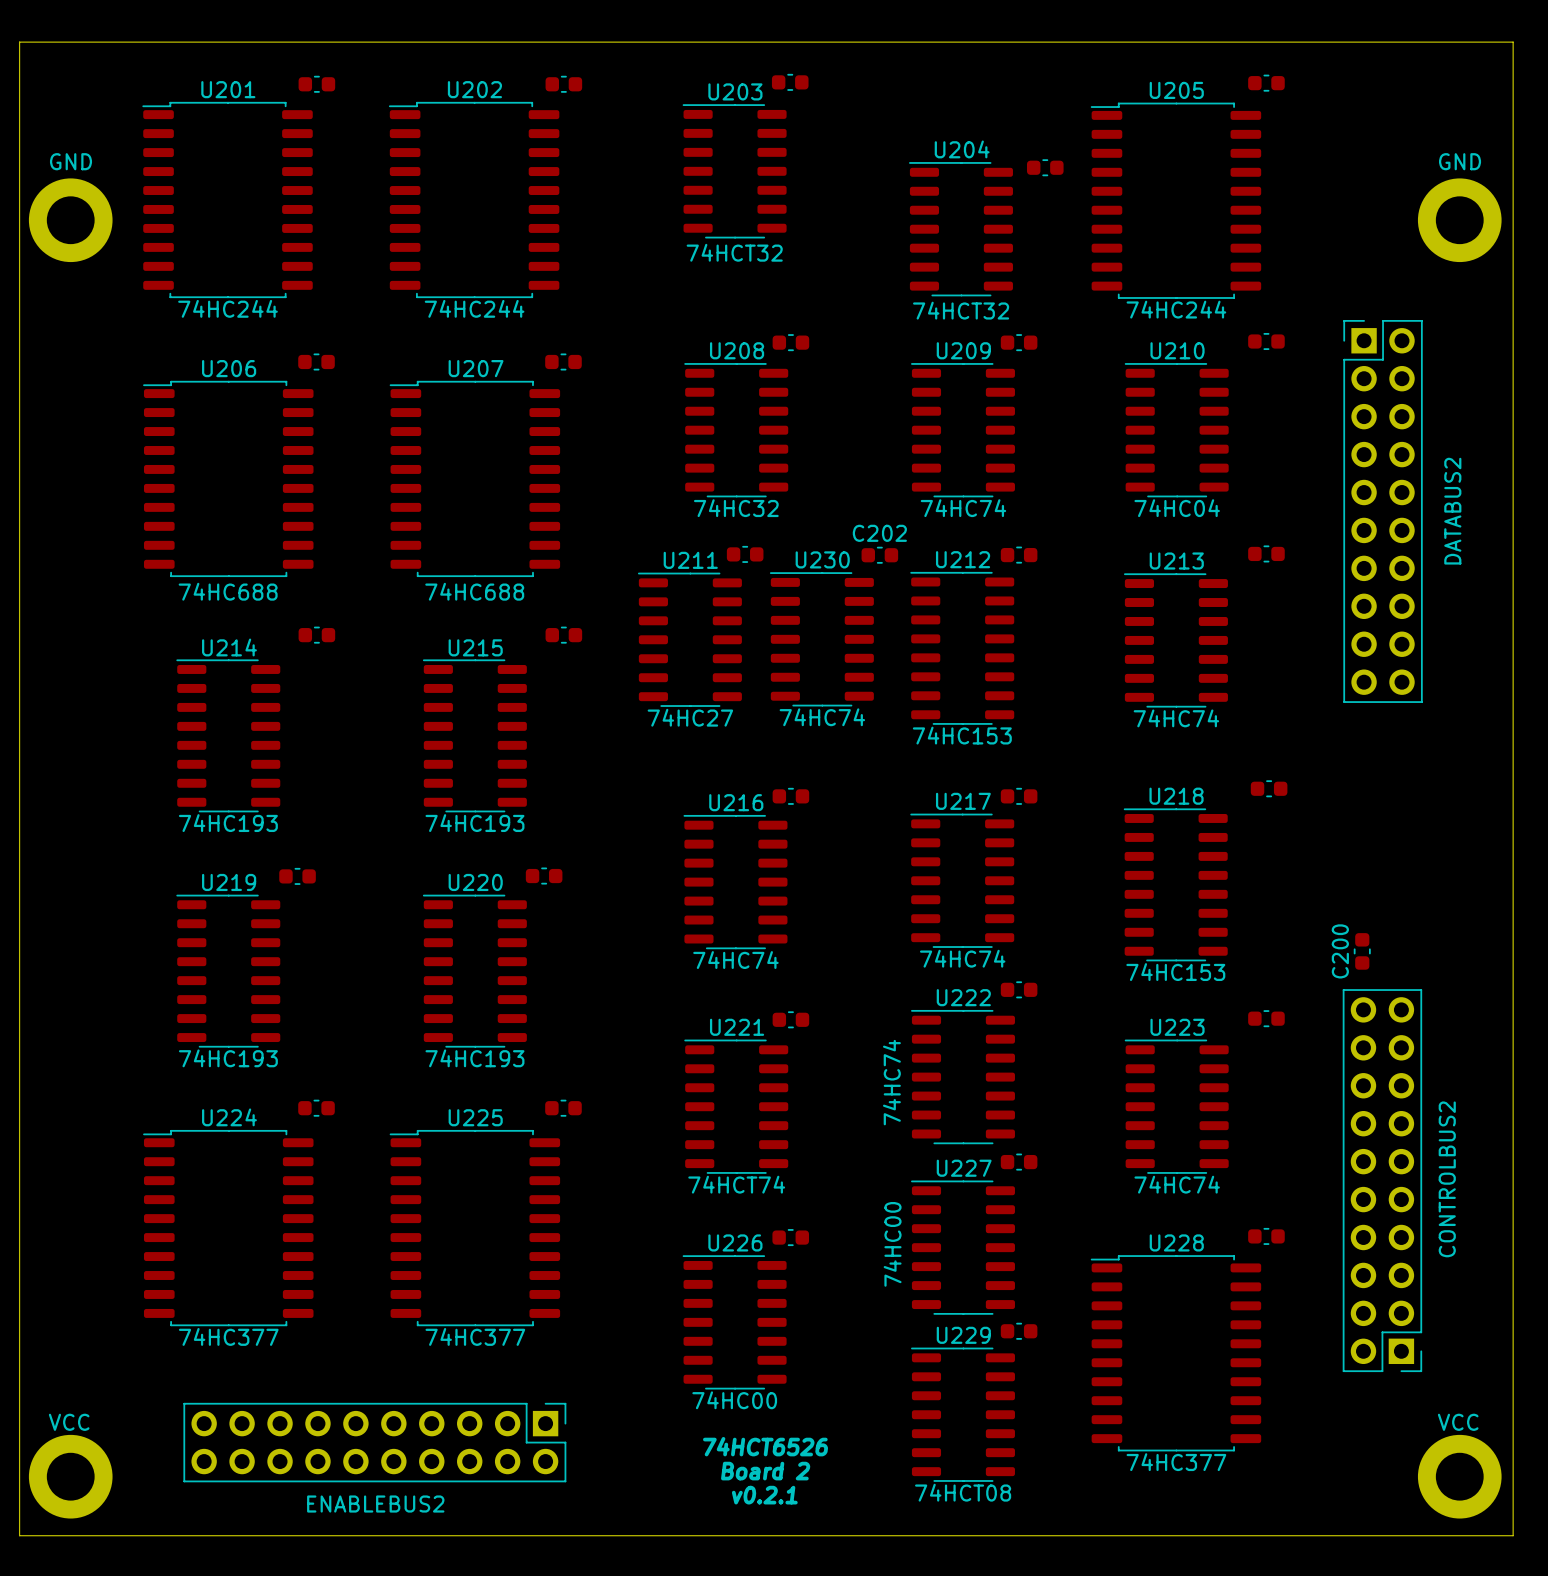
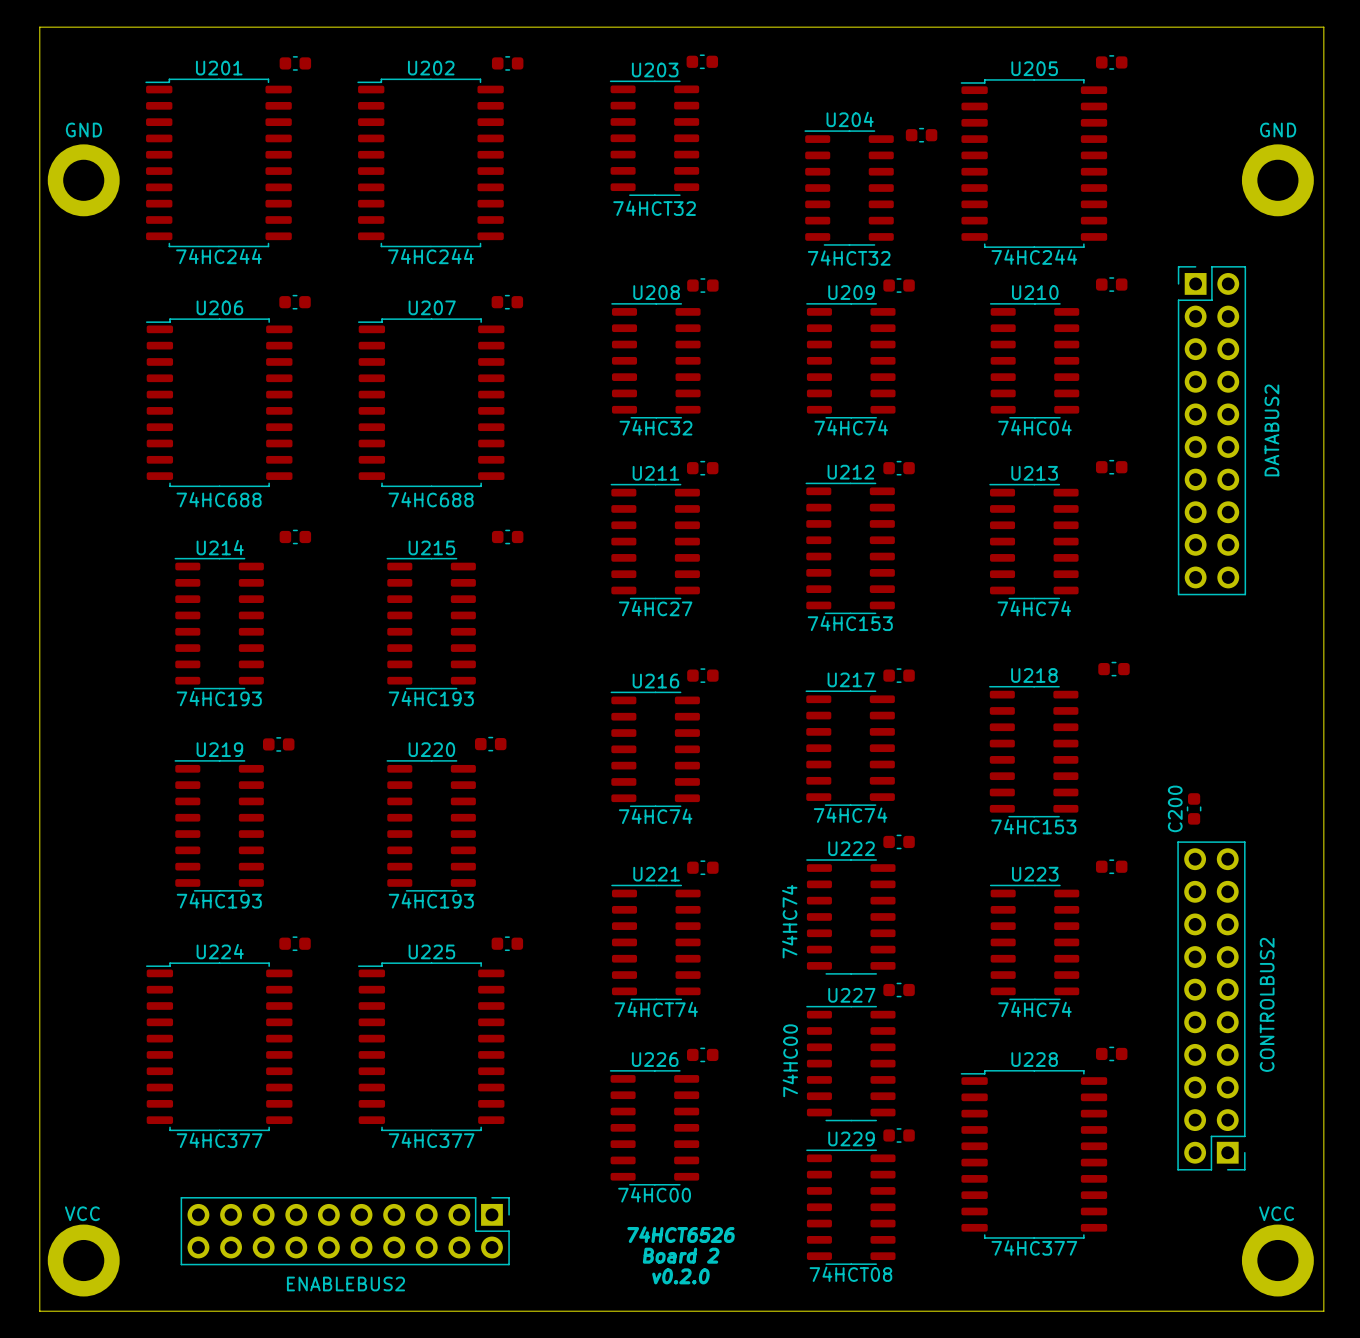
part position: (745, 554) -> (702, 468)
C202: (879, 555) -> none
U211 position: (689, 639) -> (655, 541)
U230: 74HC74 (821, 639) -> none
text: v0.2.1 (764, 1495) -> v0.2.0 (680, 1276)

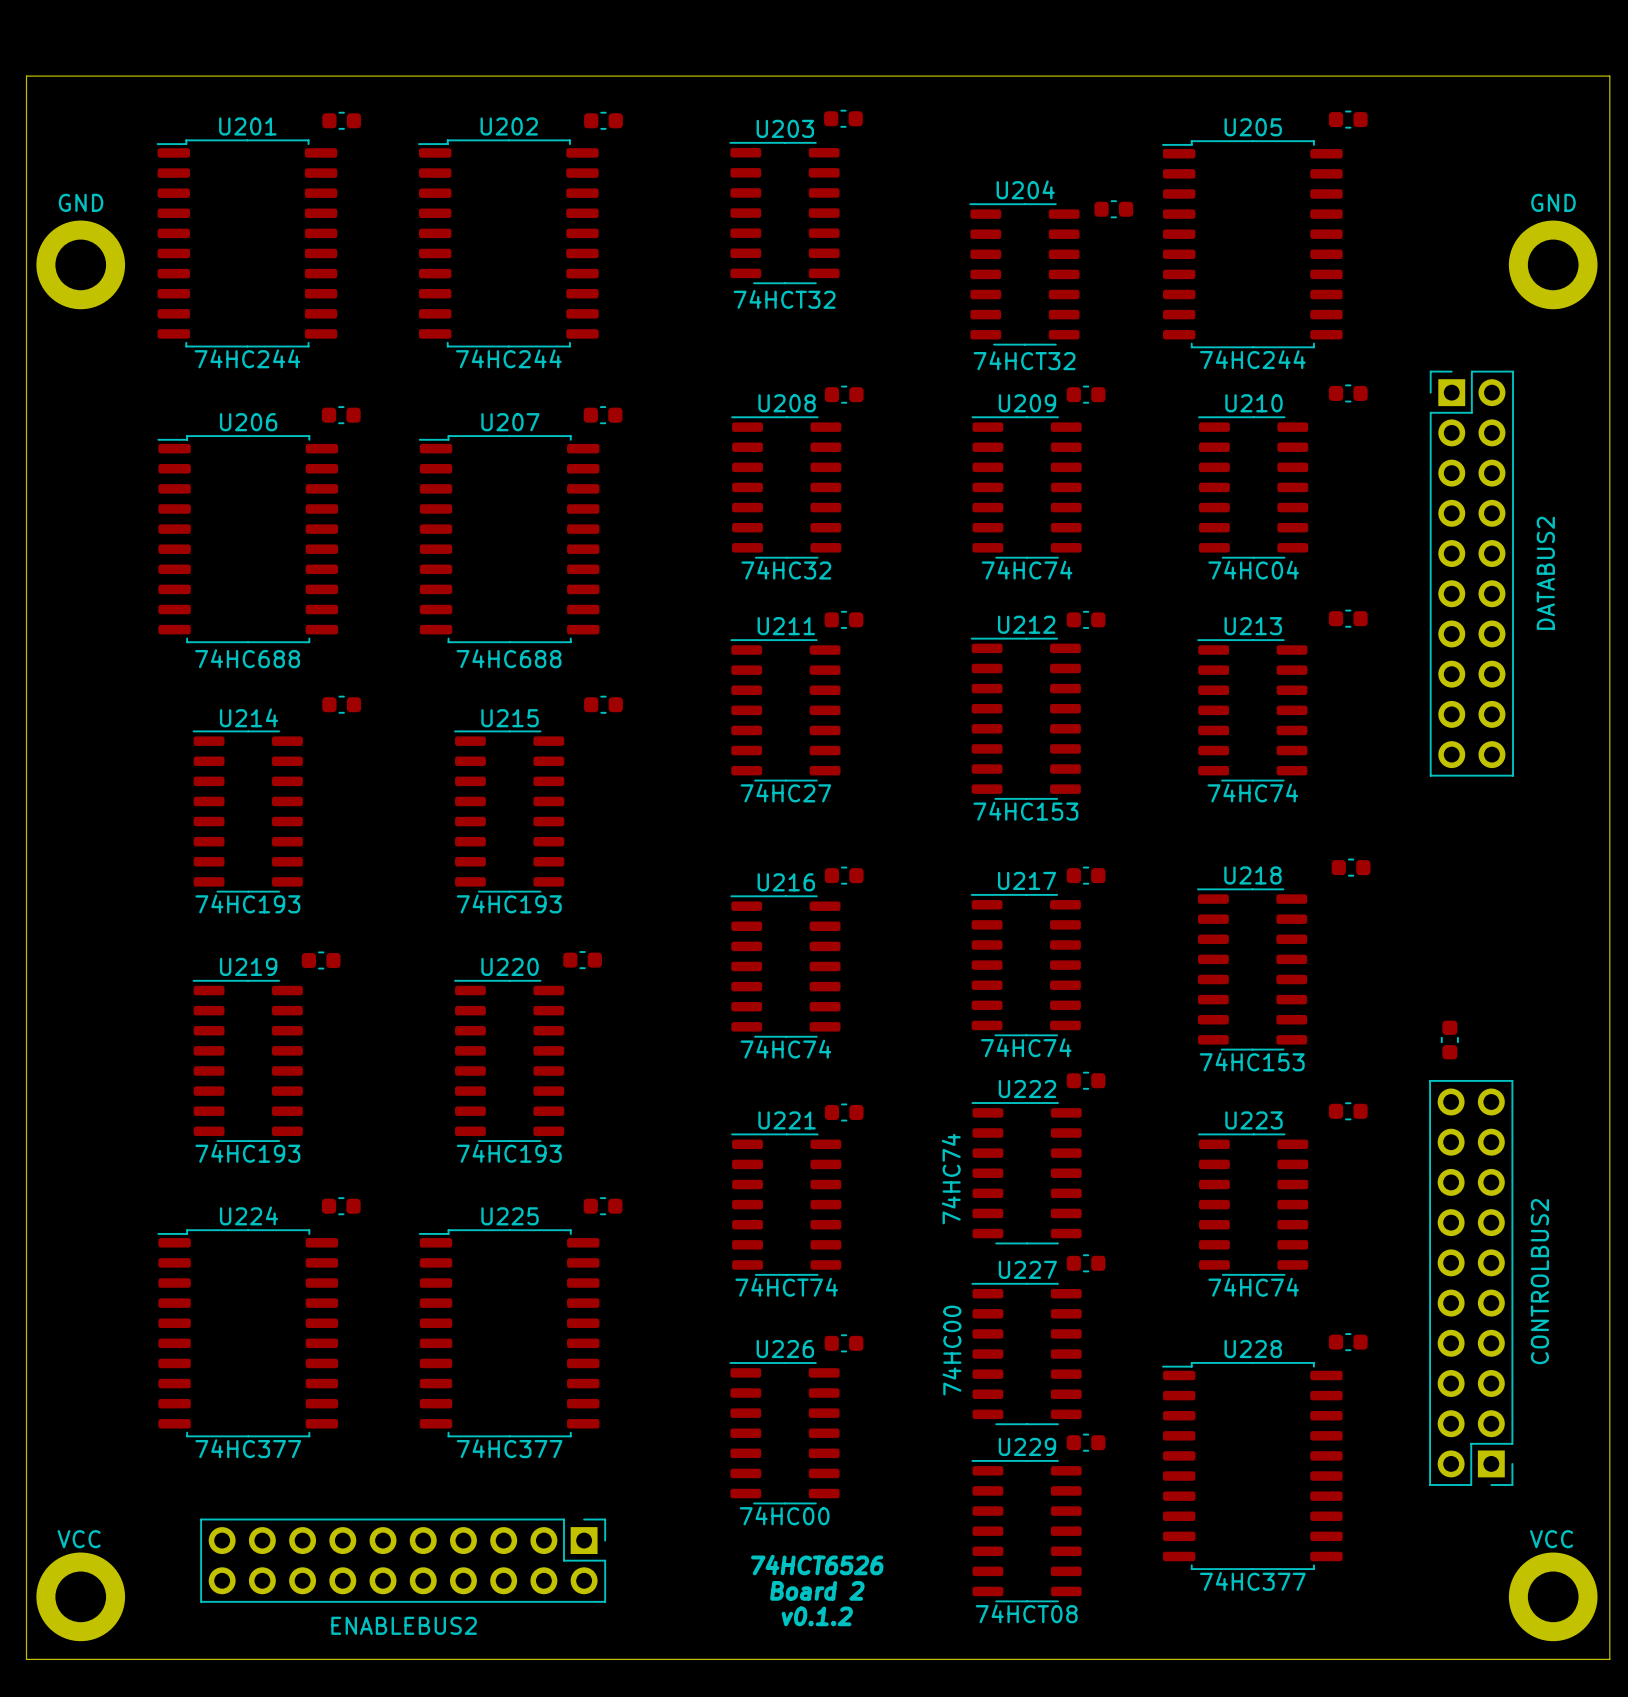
C200 name: C200 (1175, 808) -> none
text: v0.2.0 (680, 1276) -> v0.1.2 (817, 1616)

